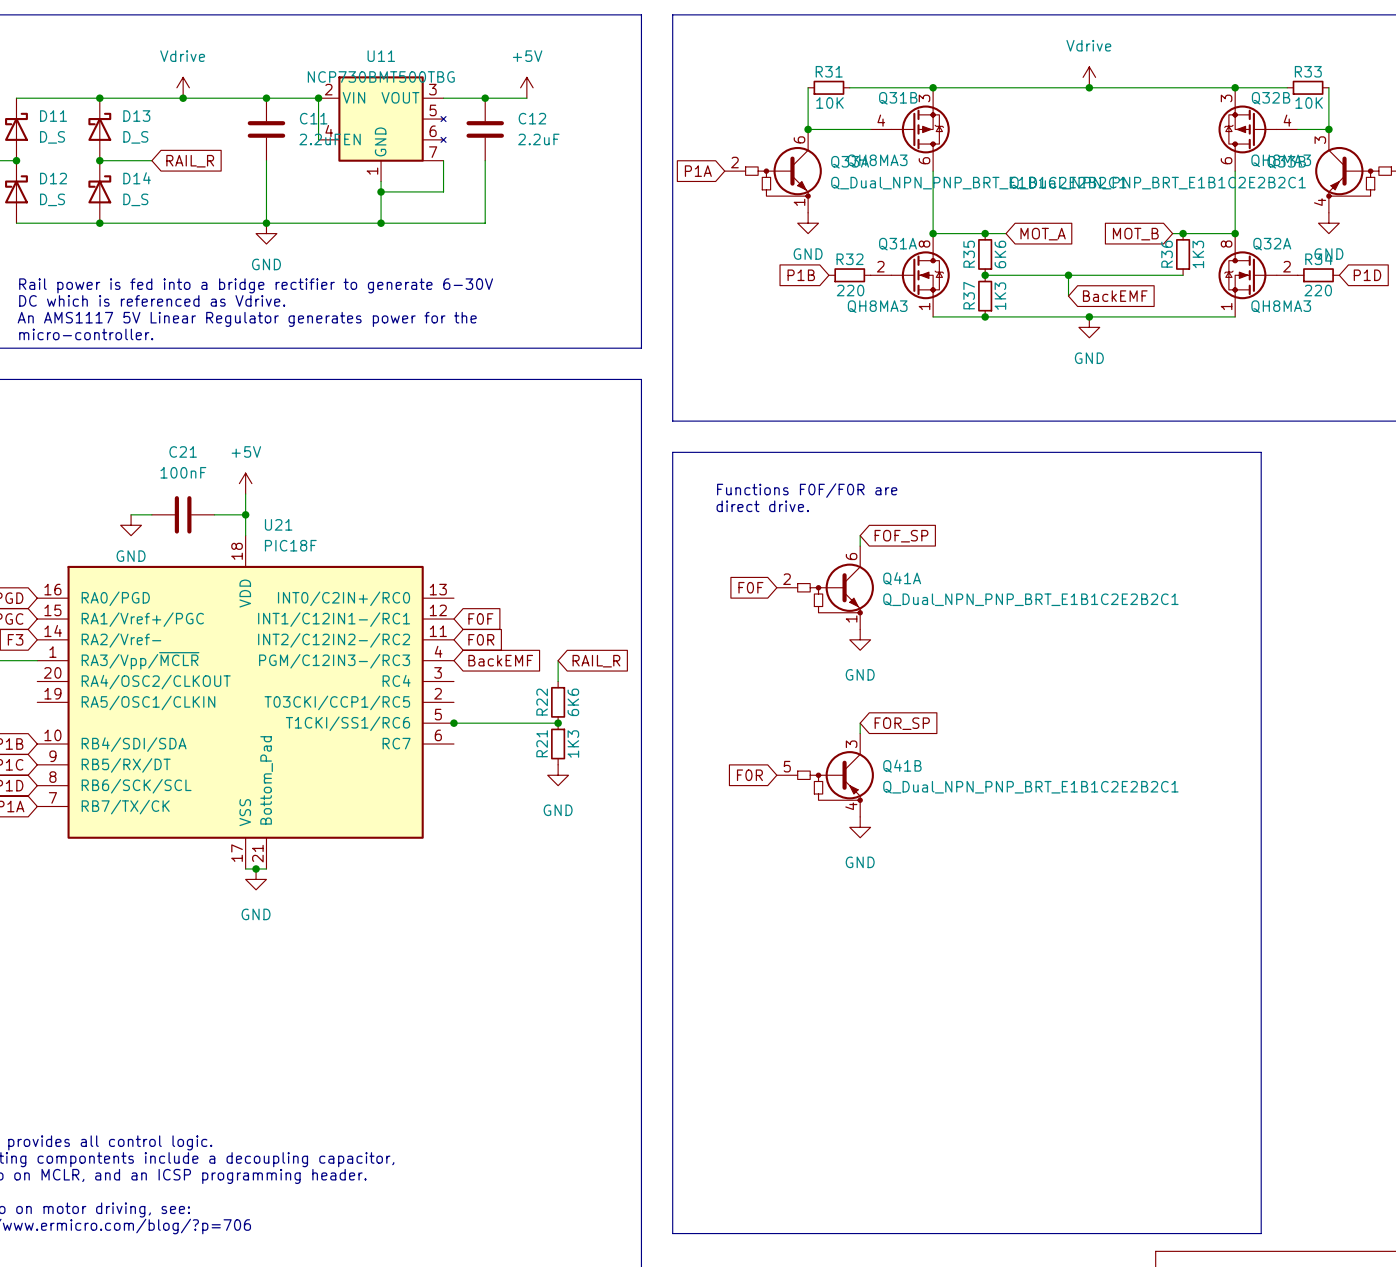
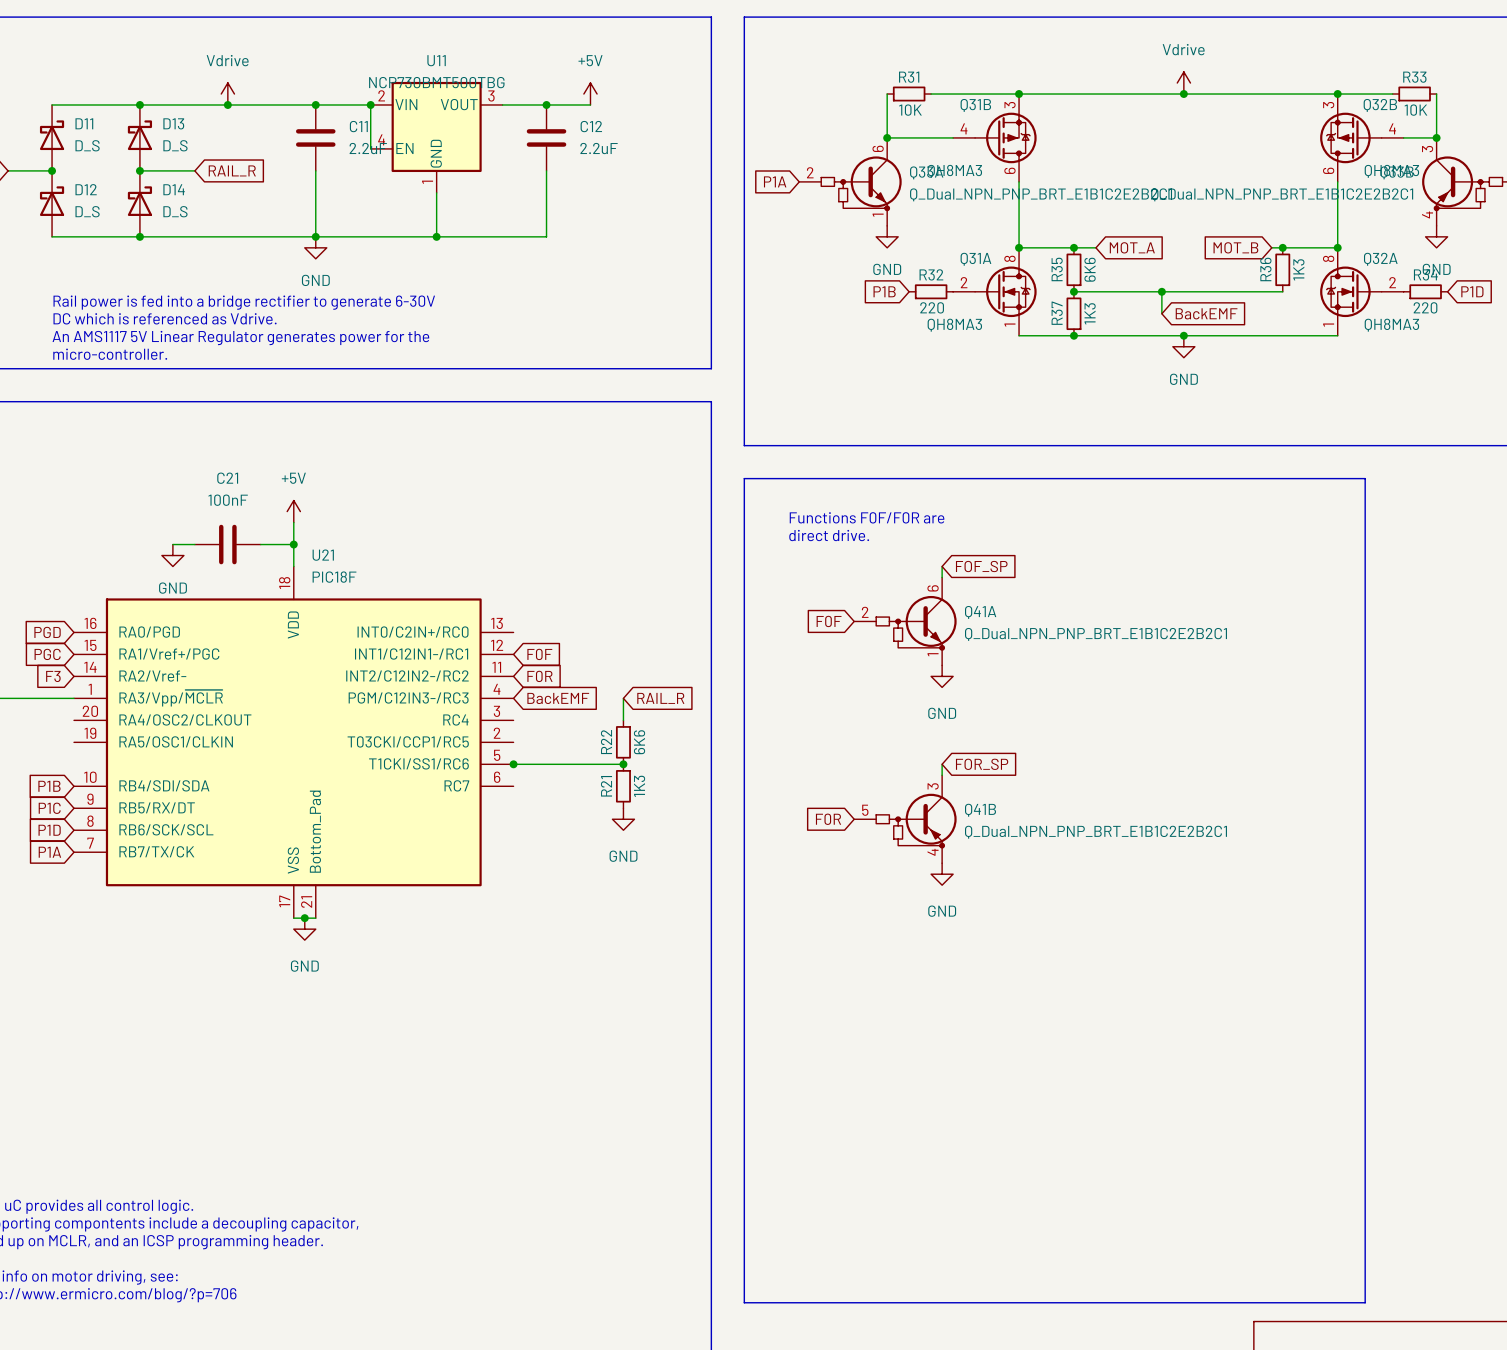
U11 symbol: [318, 76, 447, 182] -> [370, 81, 503, 193]
wire: (443, 160) (443, 191) (381, 191) -> none
junction: (381, 191) -> none

